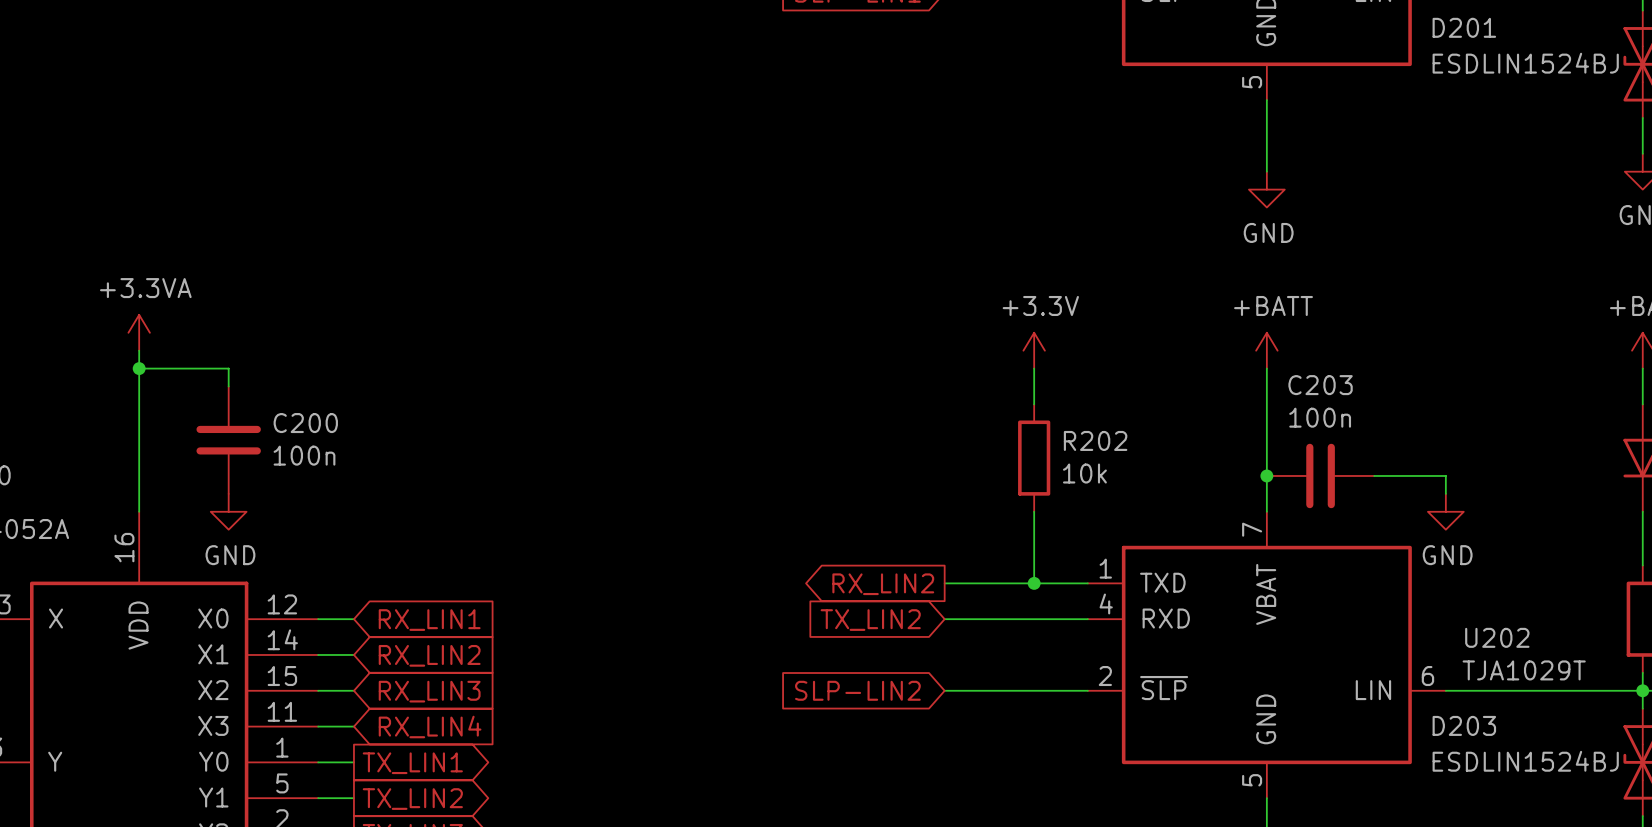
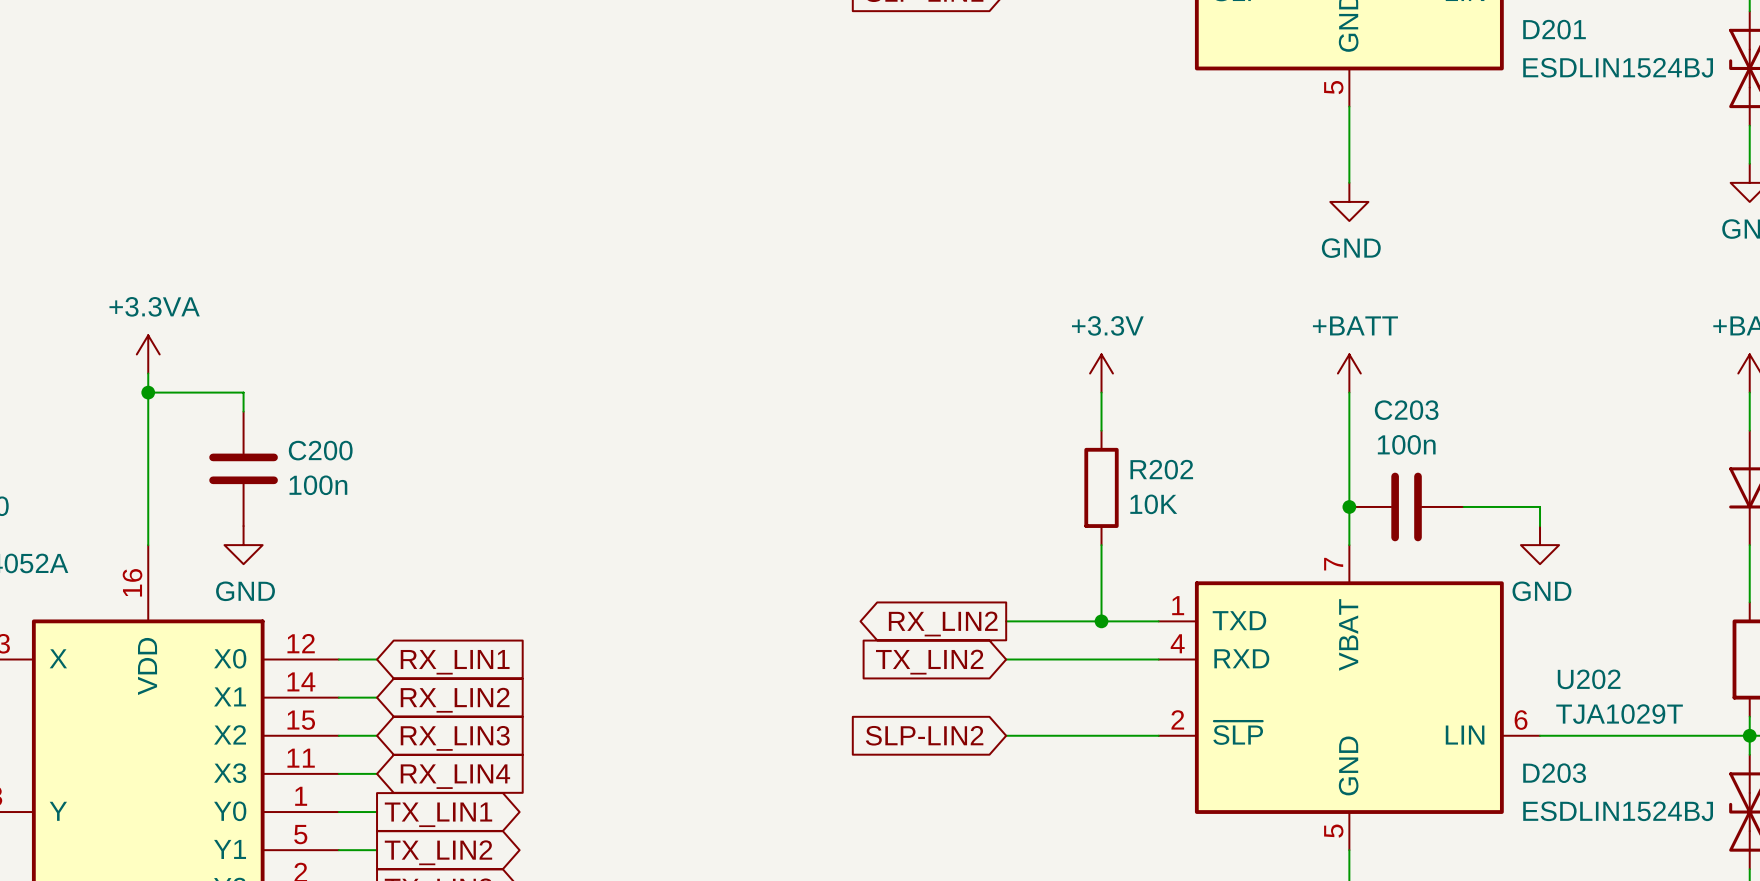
R202 value: 10k (1084, 473) -> 10K (1153, 504)

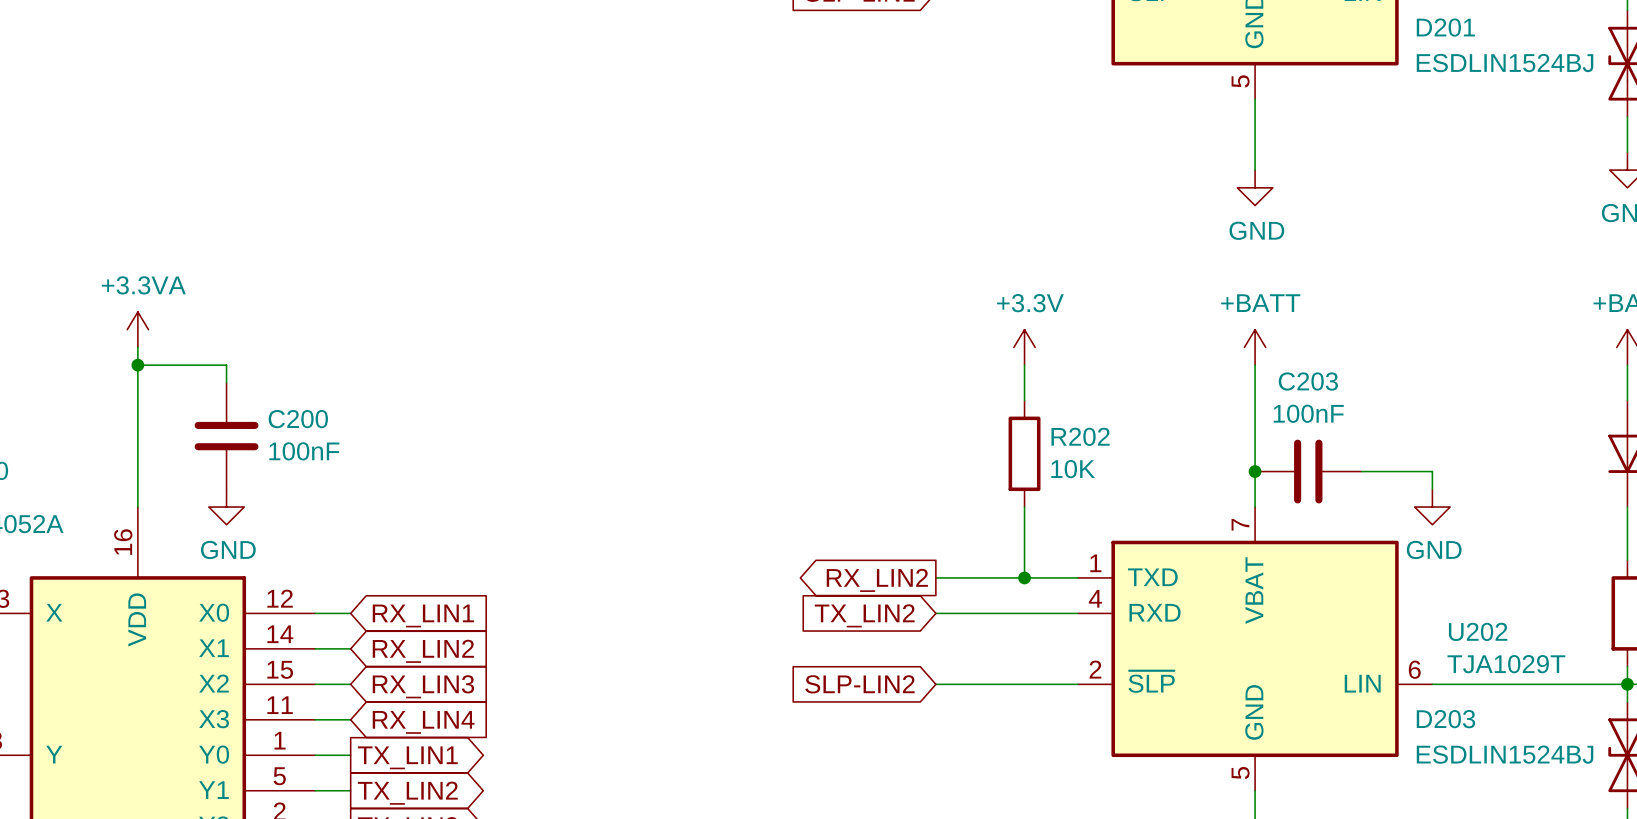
C203 value: 100n (1406, 444) -> 100nF (1308, 413)
C200 value: 100n (318, 485) -> 100nF (304, 451)

